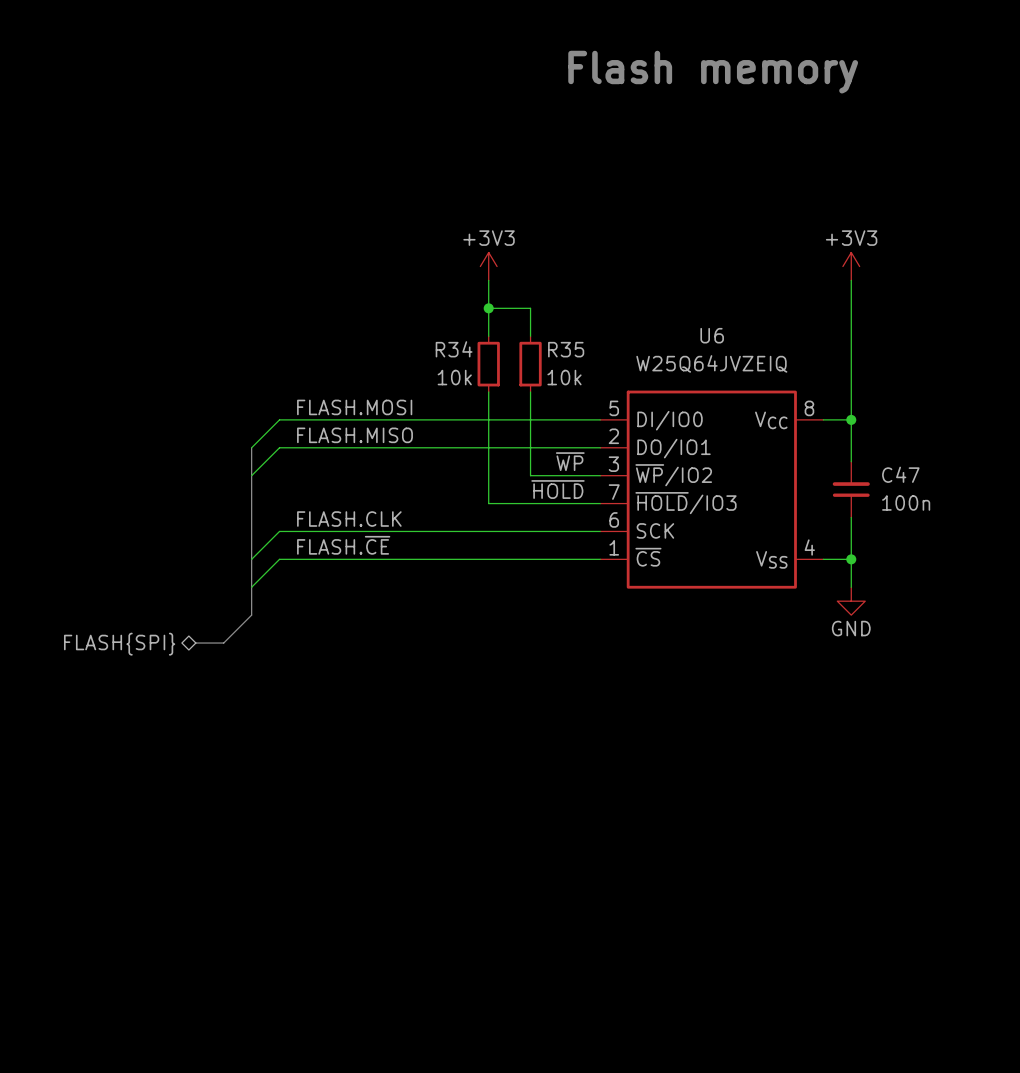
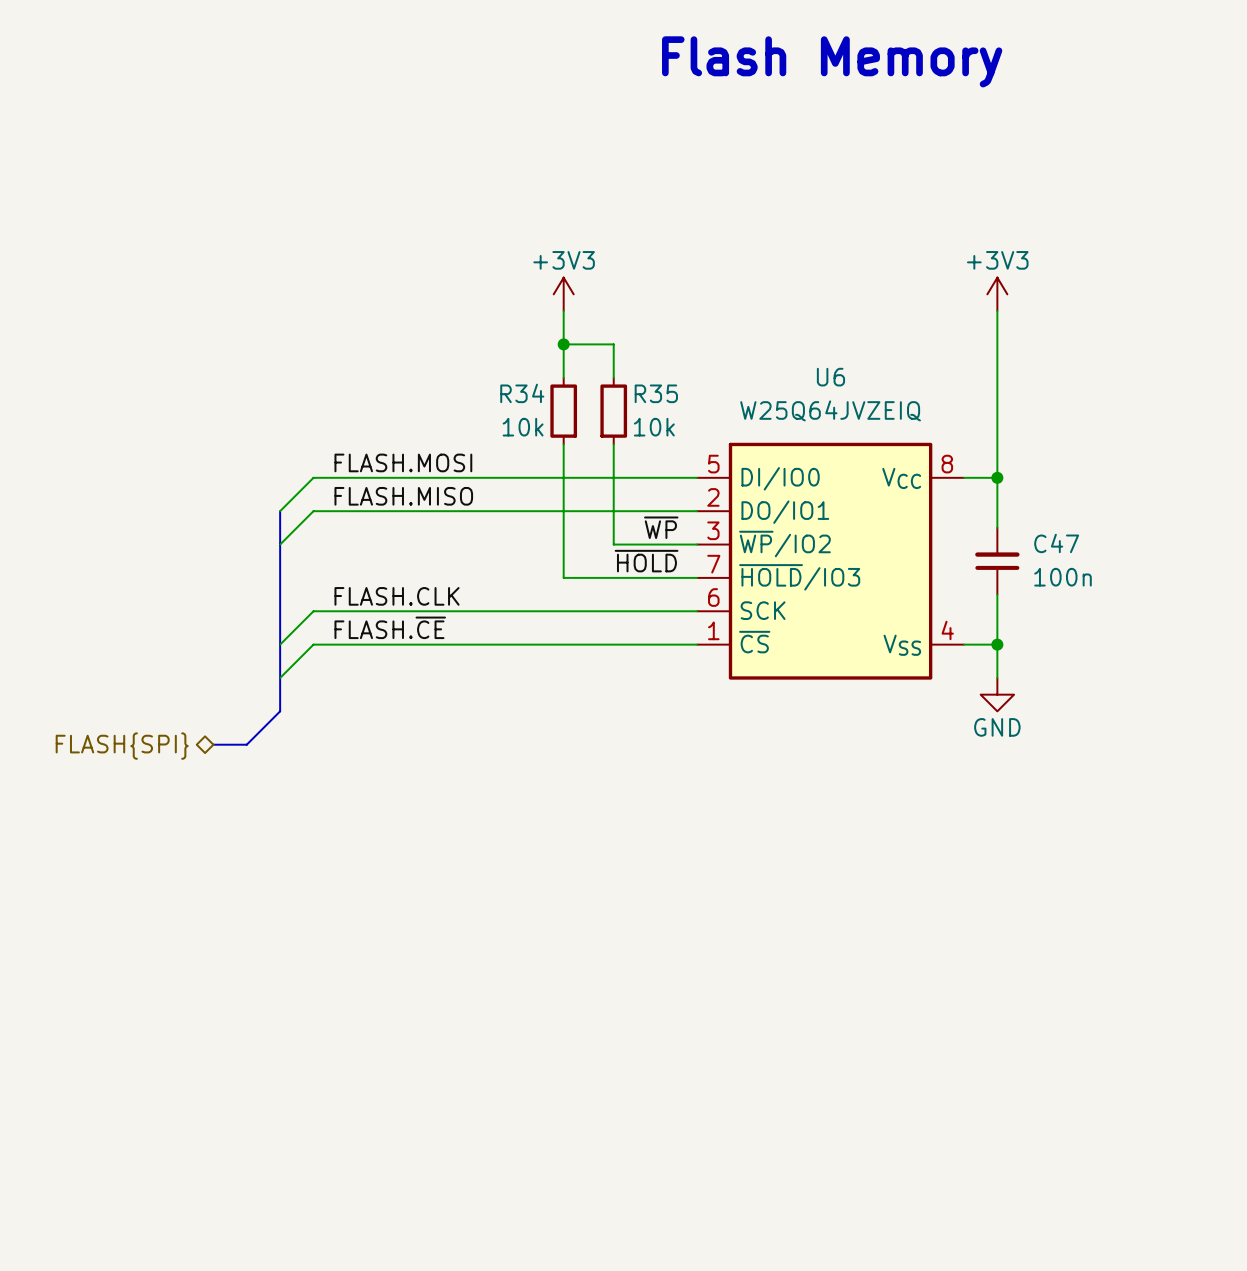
text: Flash memory (713, 72) -> Flash Memory (832, 61)

